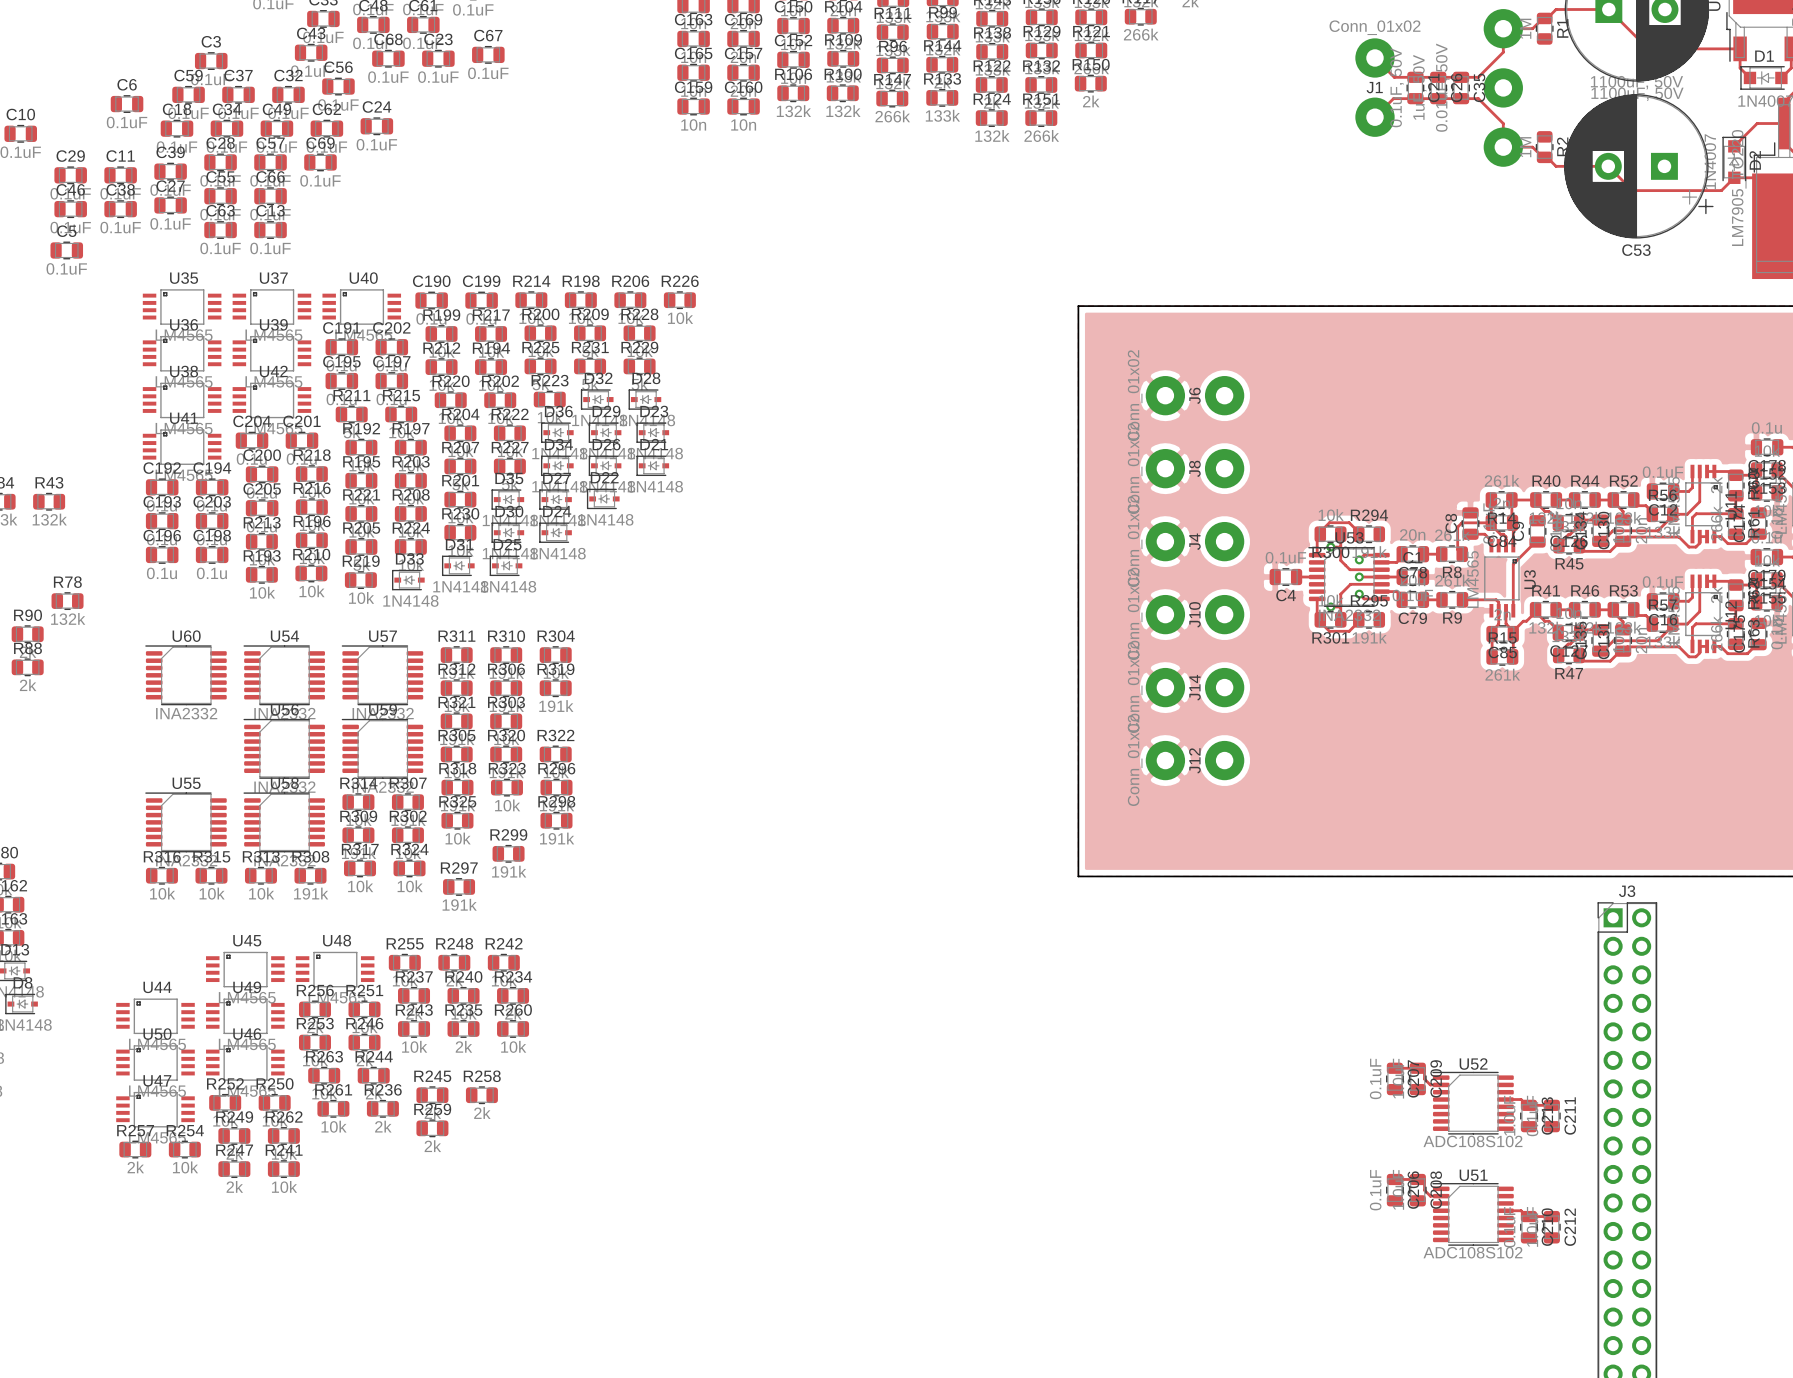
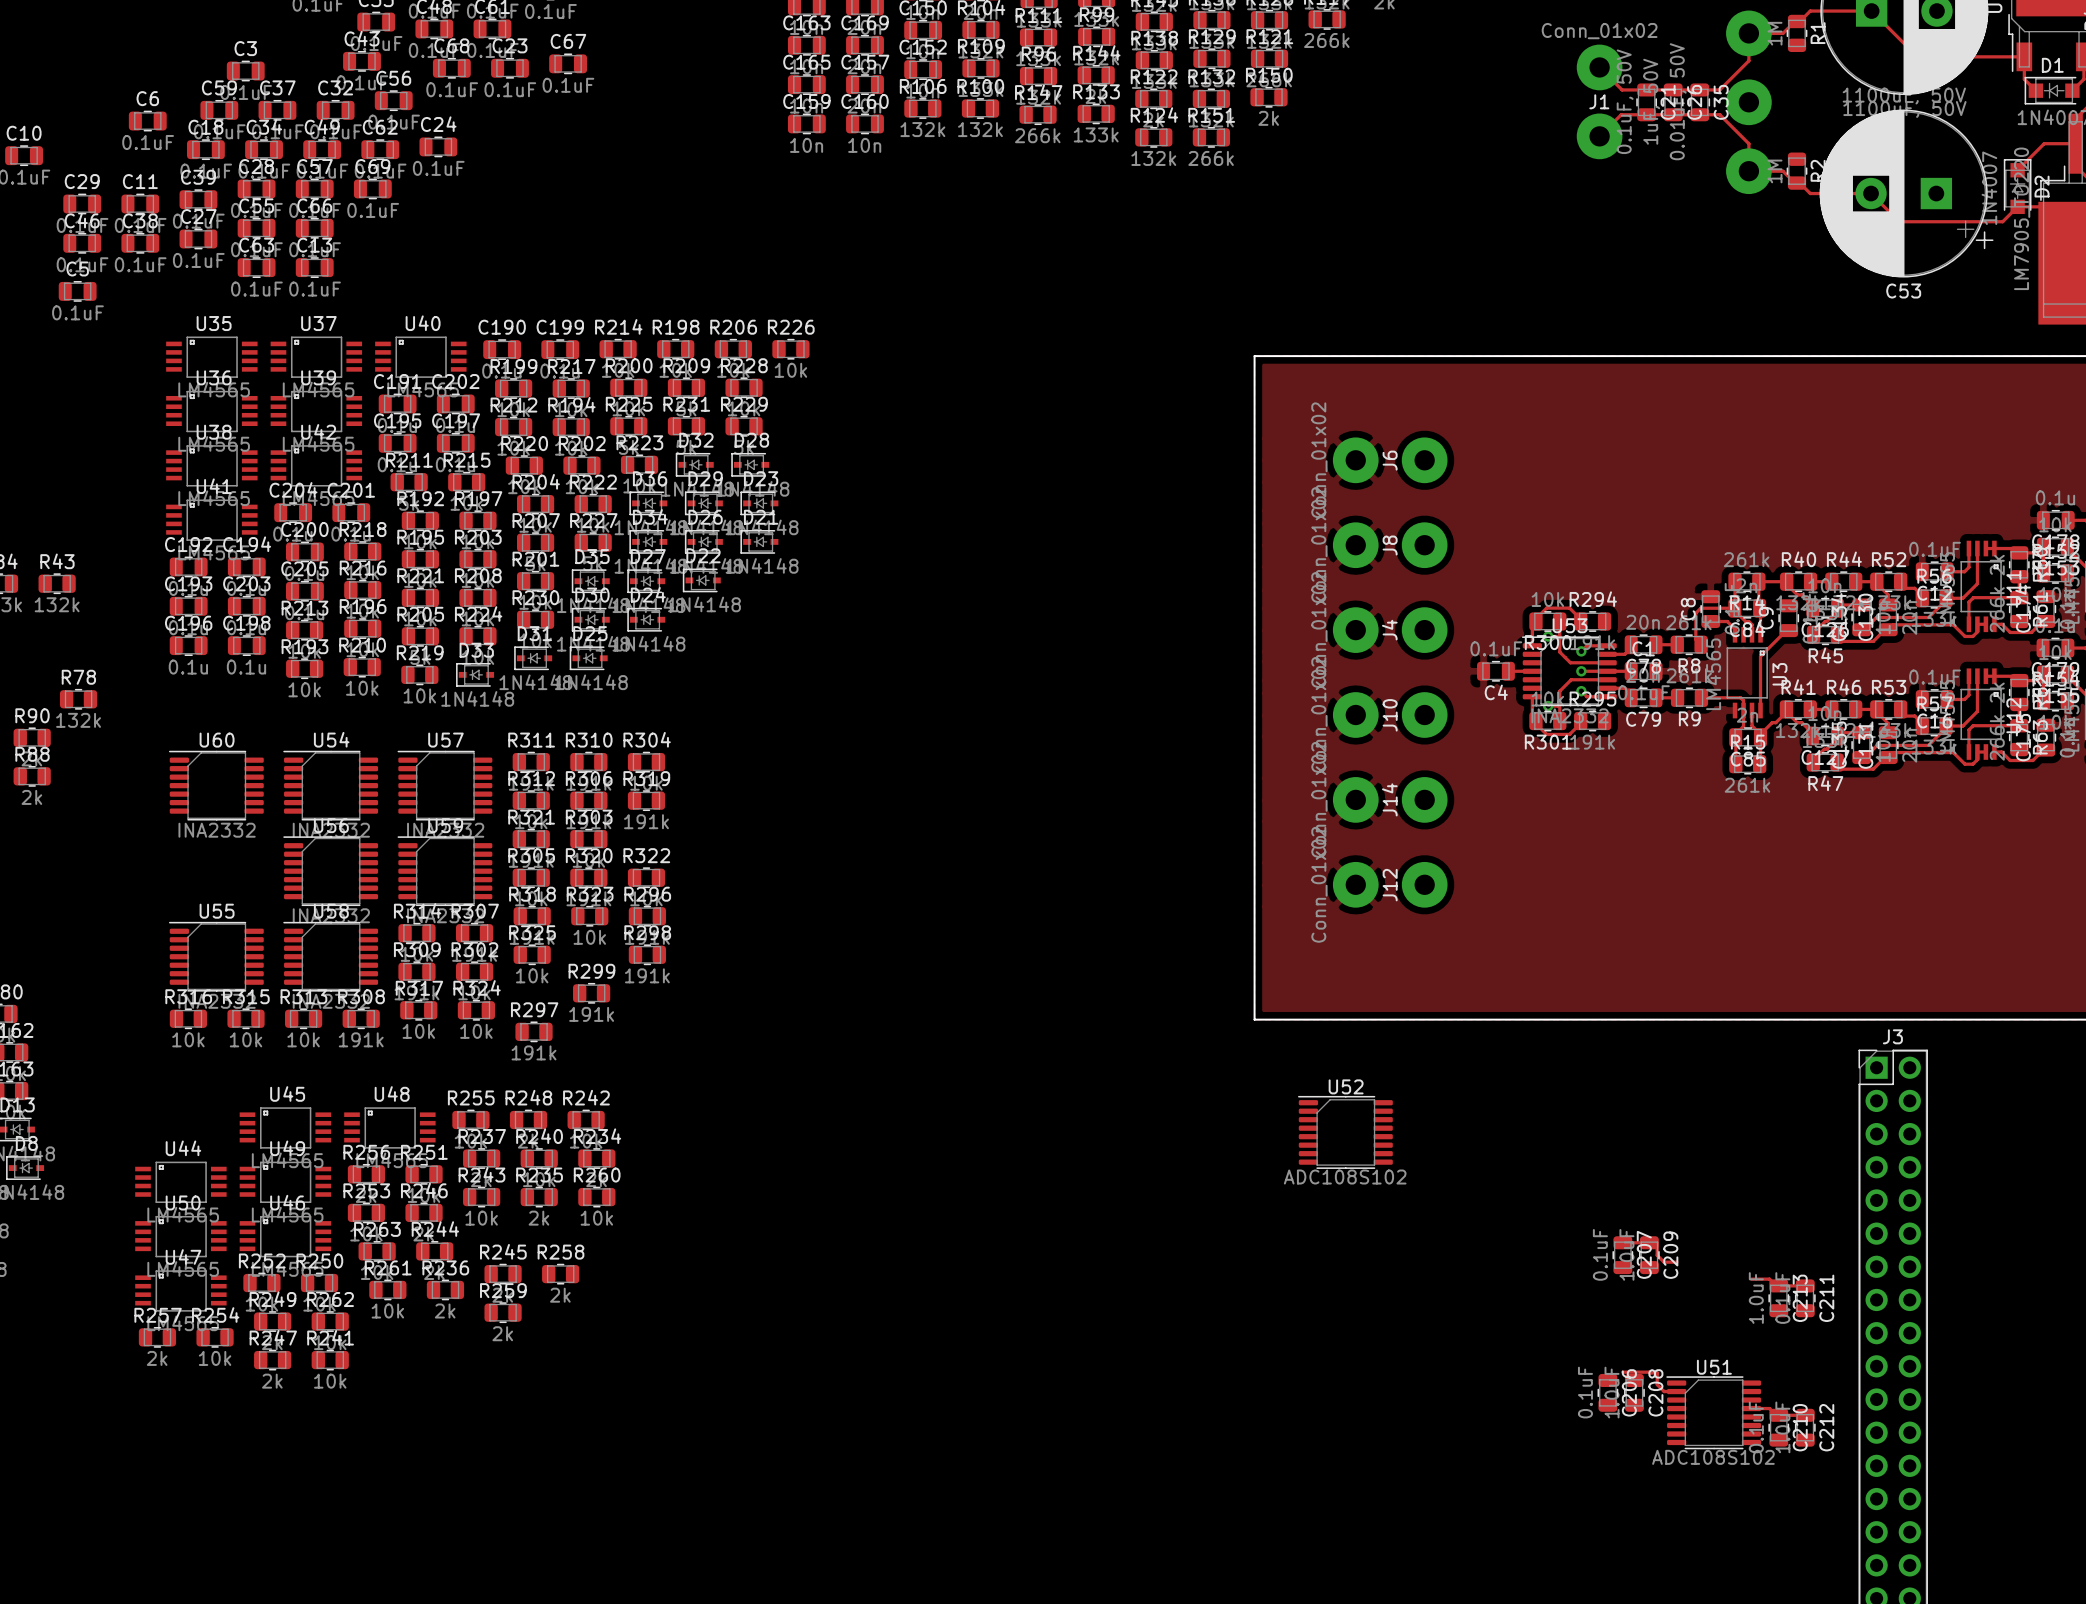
U52 position: (1473, 1103) -> (1345, 1132)
C206 position: (1394, 1190) -> (1607, 1392)
C208 position: (1417, 1190) -> (1634, 1392)

